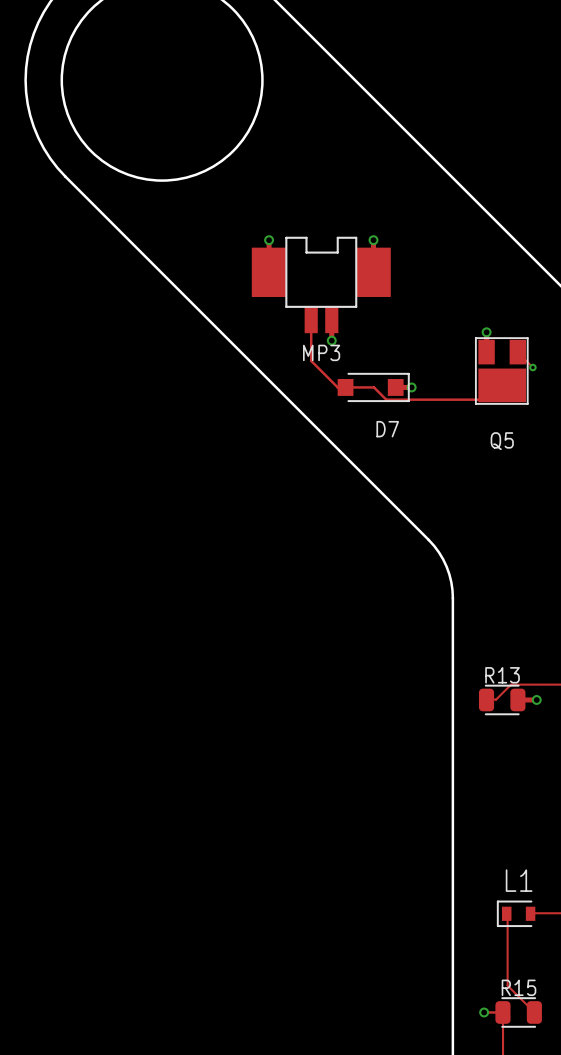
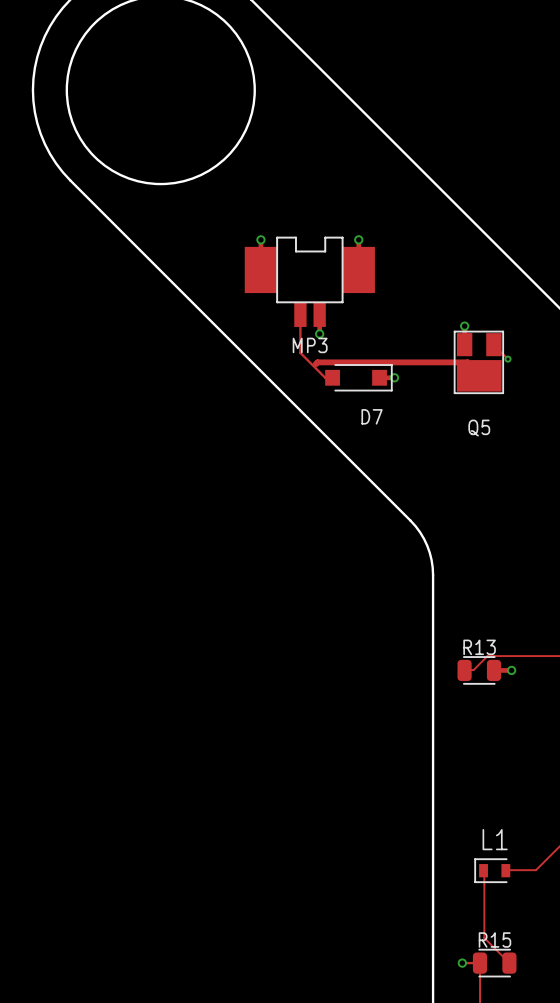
track: (502, 385) (487, 399) (386, 399) (374, 387) (345, 387) -> (479, 375) (467, 362) (317, 362) (315, 364)

